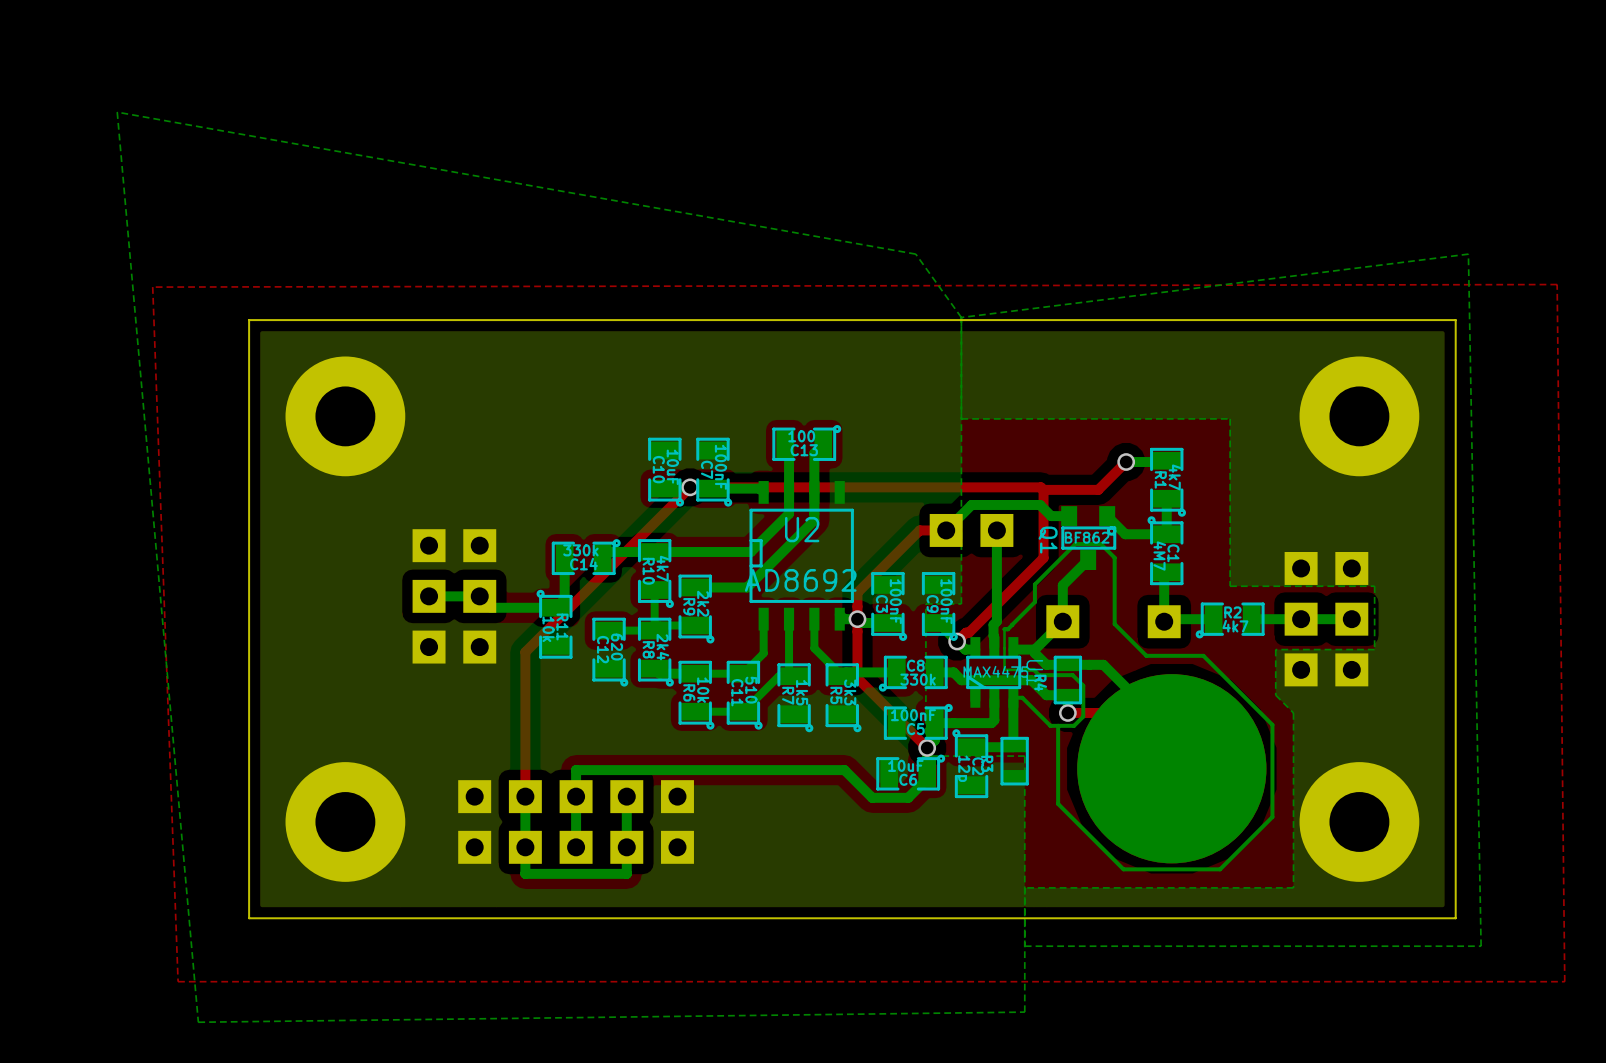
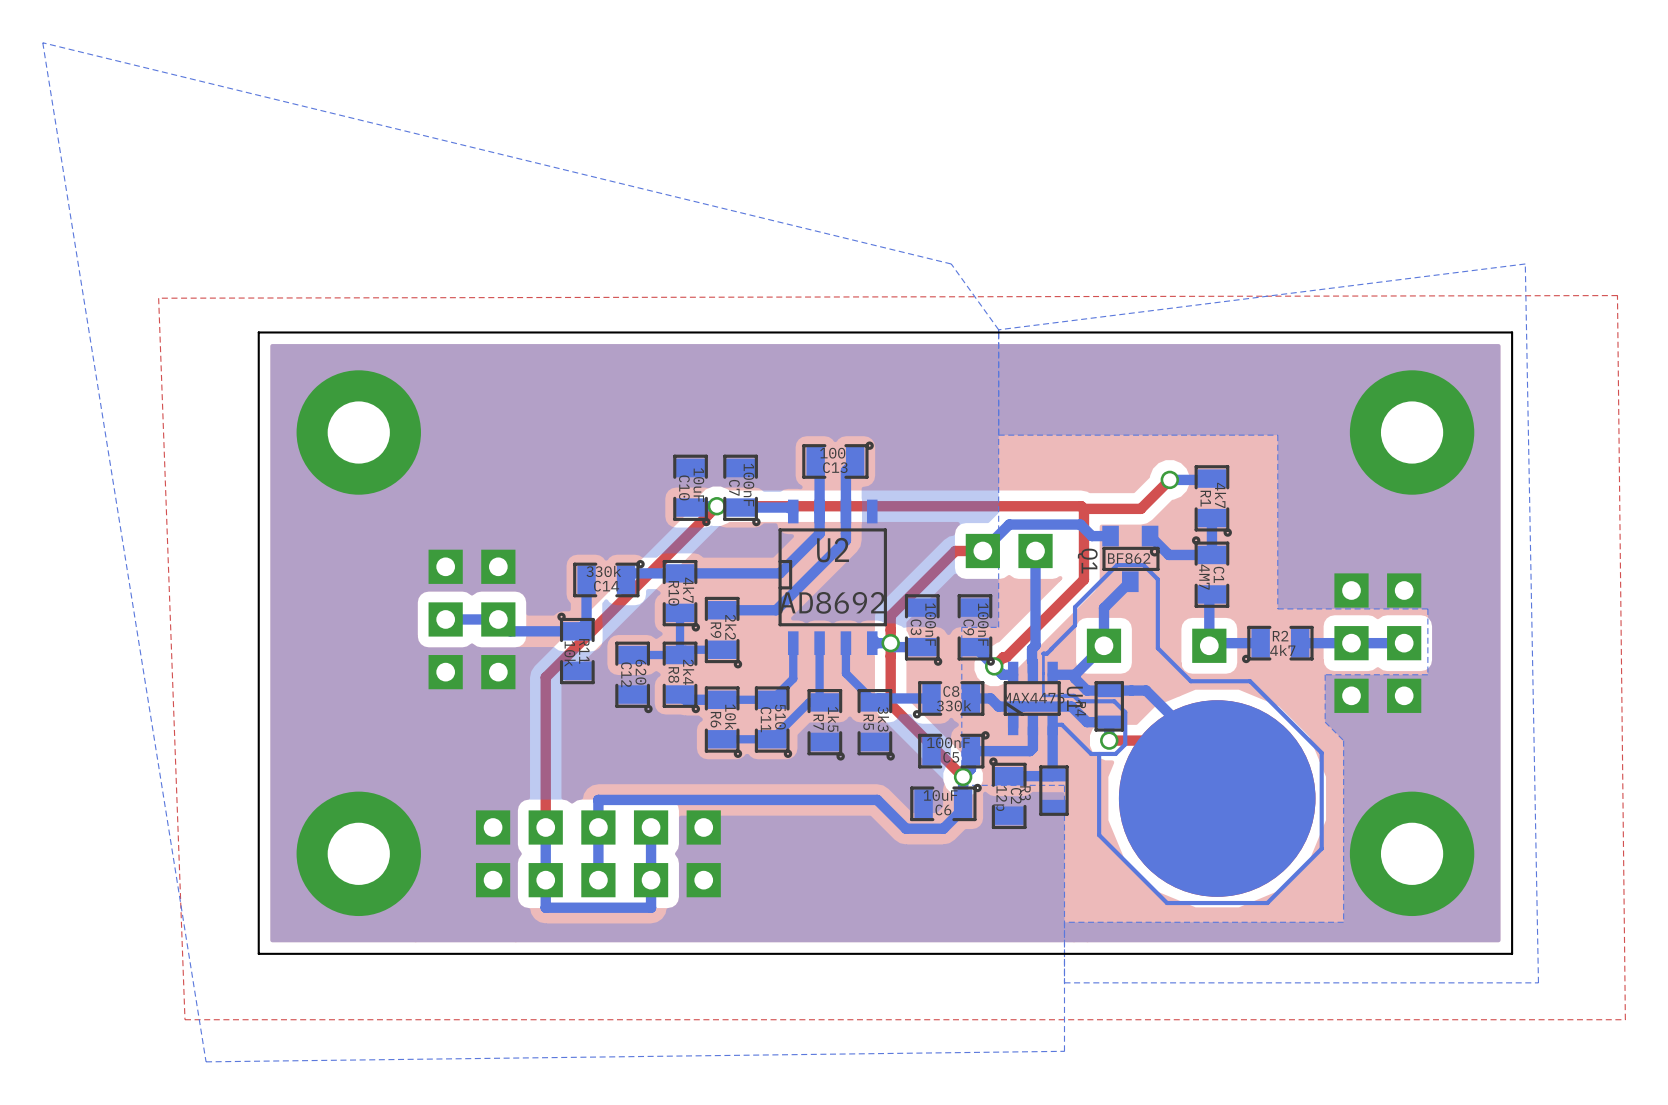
bottom zone outline: (915, 254) (117, 112) (198, 1022) -> (951, 263) (42, 42) (206, 1061)

